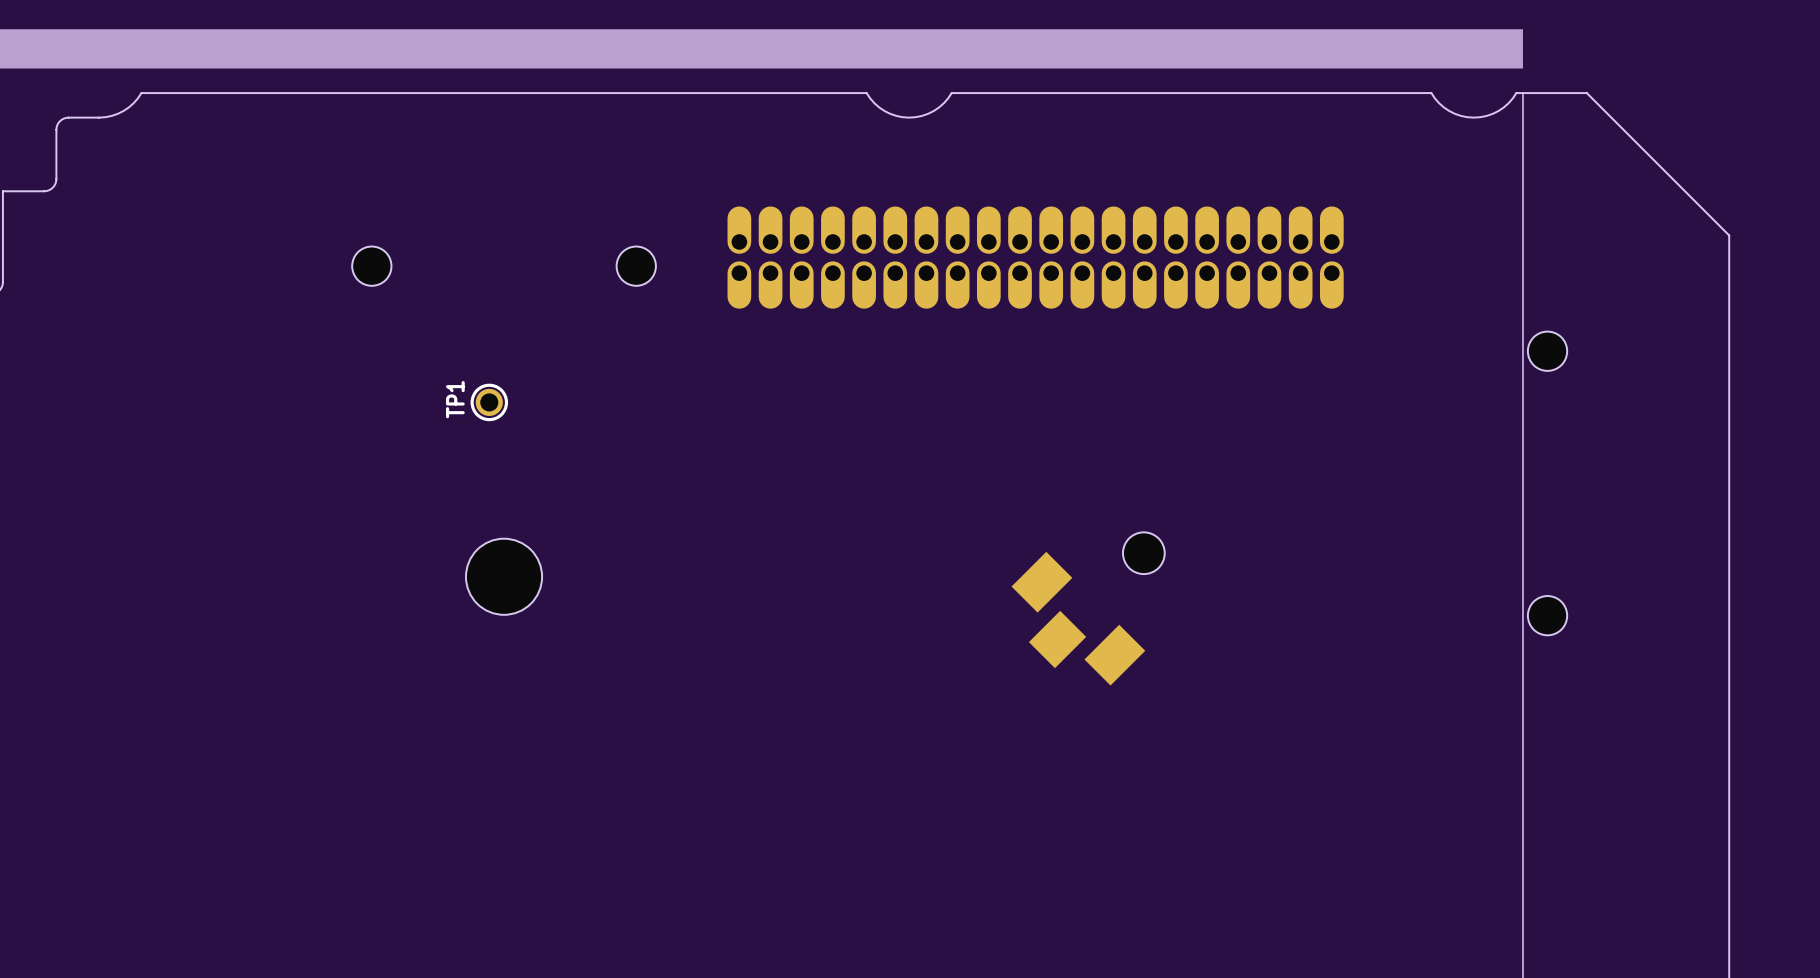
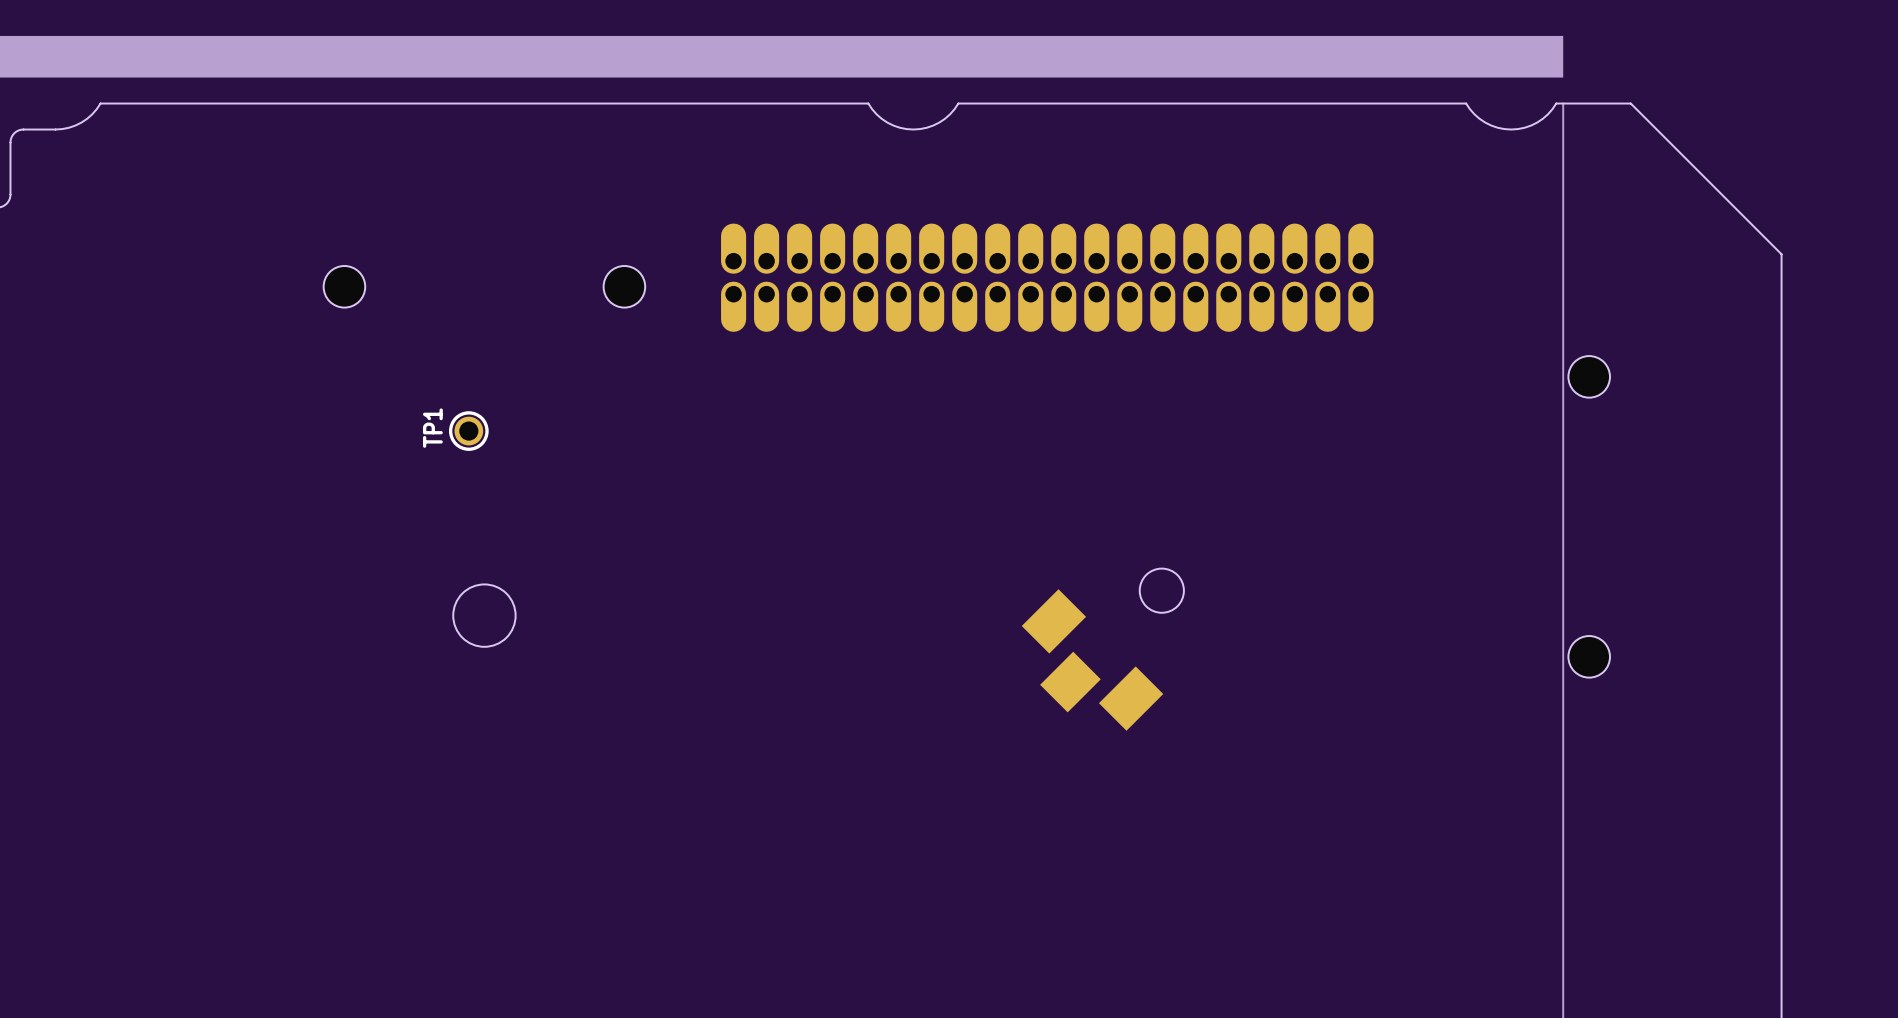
round board edge: none -> [1139, 568, 1184, 613]
round board edge: none -> [453, 584, 516, 647]
hole: (1143, 553) -> none
hole: (504, 576) -> none

